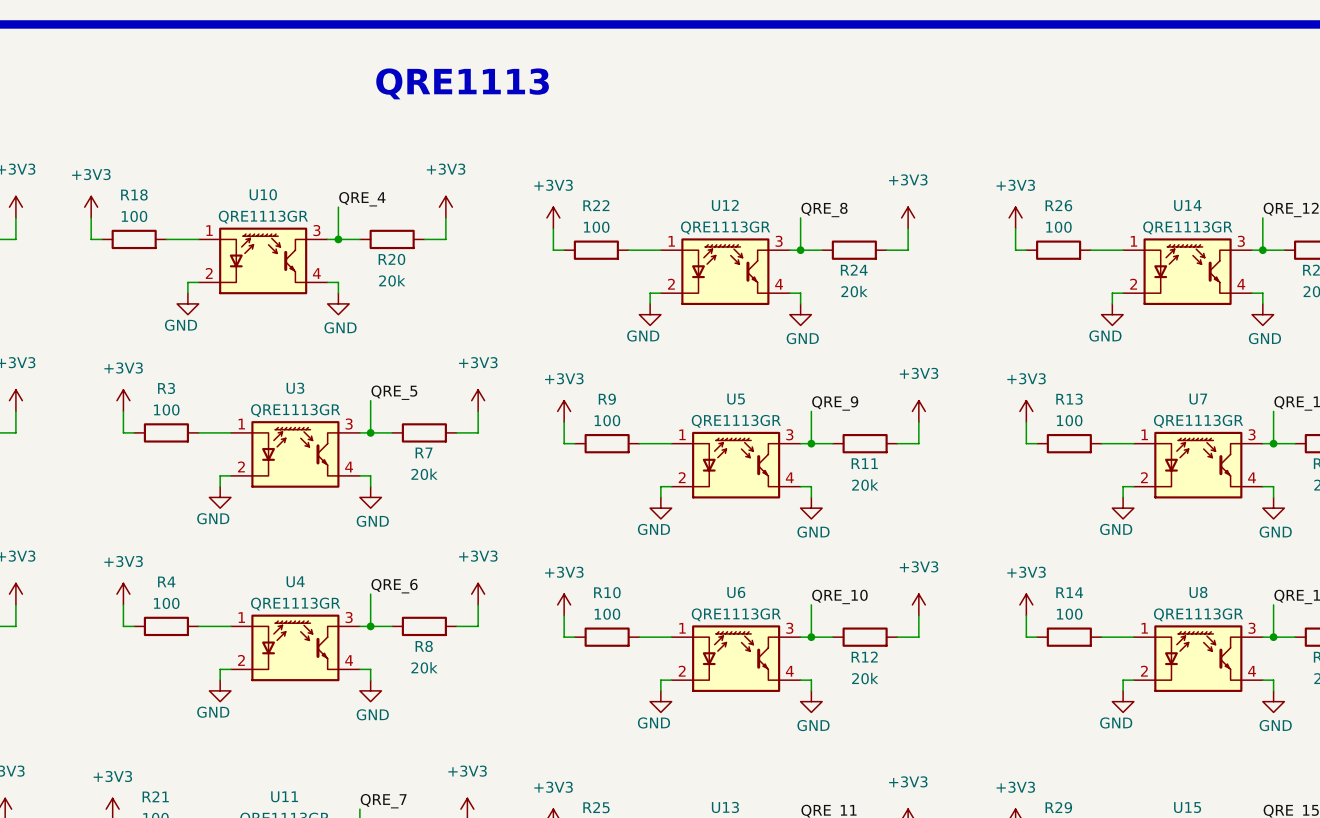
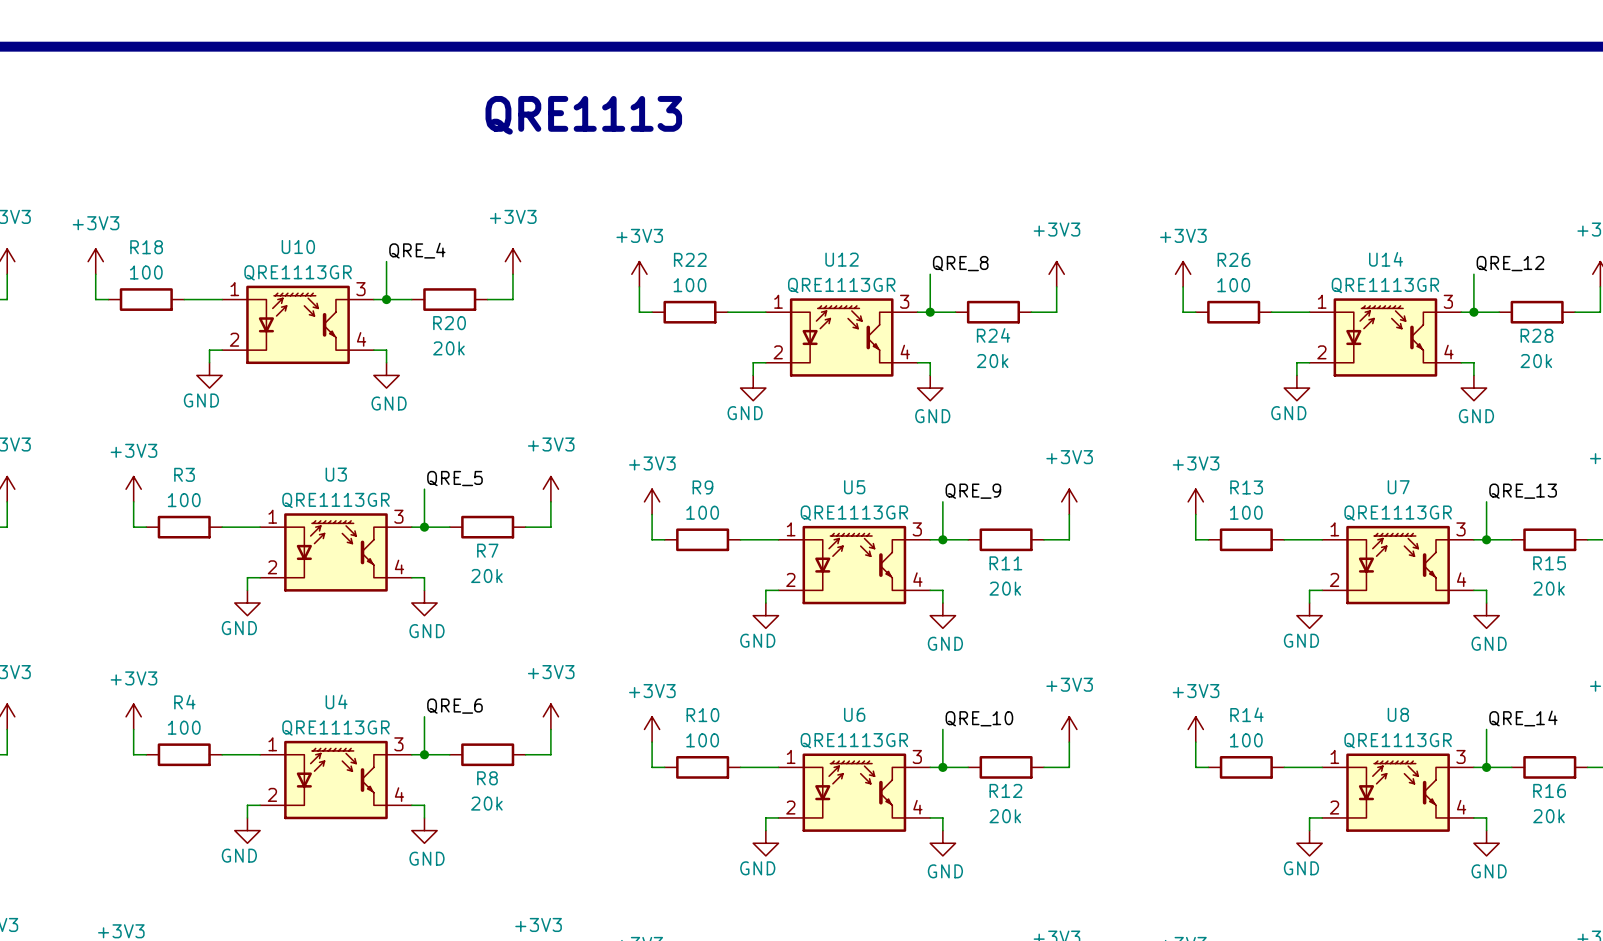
text position: QRE1113 (462, 83) -> QRE1113 (583, 115)

